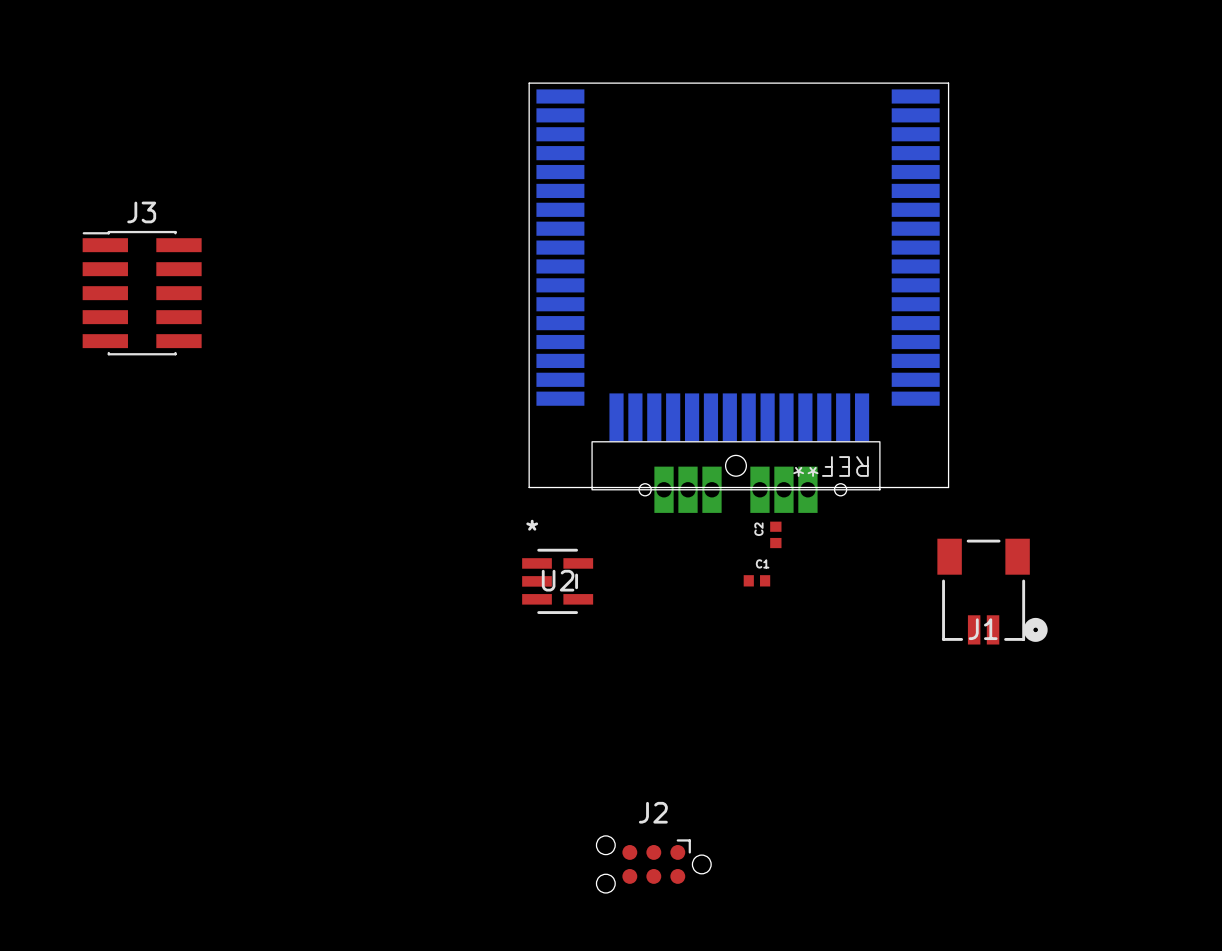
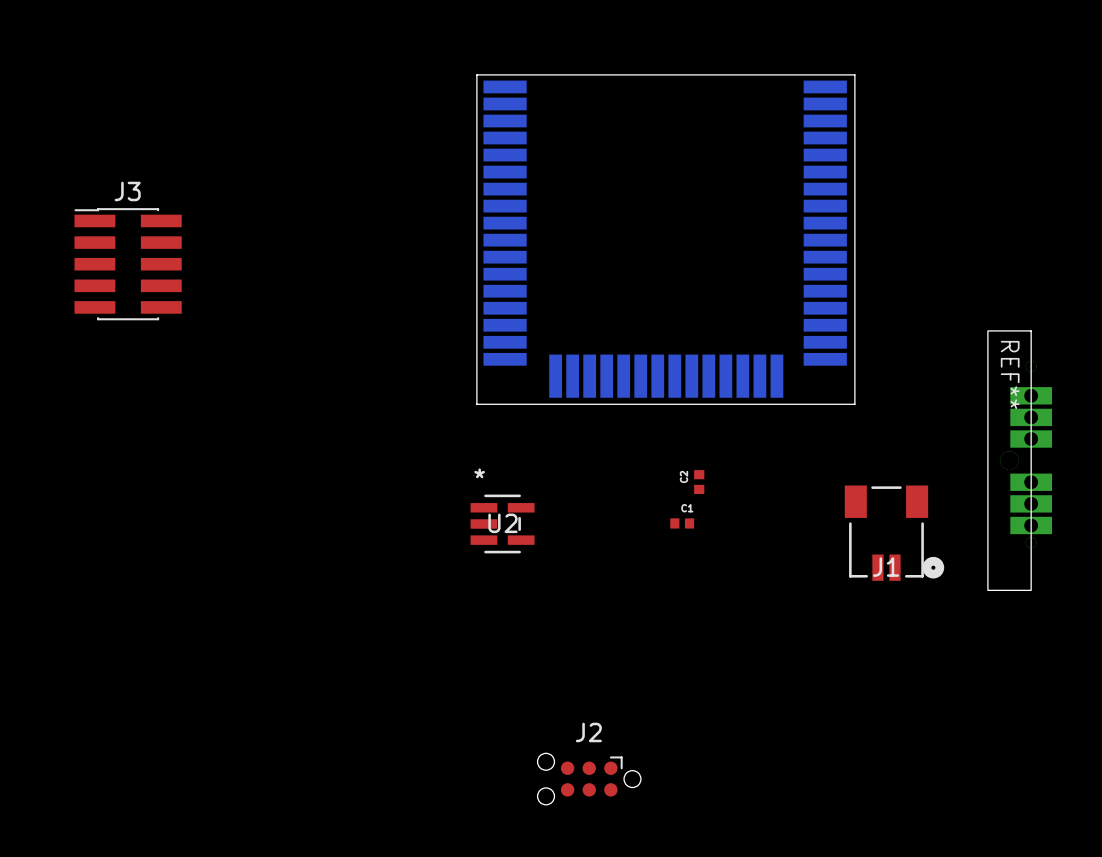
board edge: (529, 448) (529, 487) (948, 487) (948, 448) -> (476, 404) (854, 404)
REF**: (735, 477) -> none
REF**: none -> (1019, 460)

